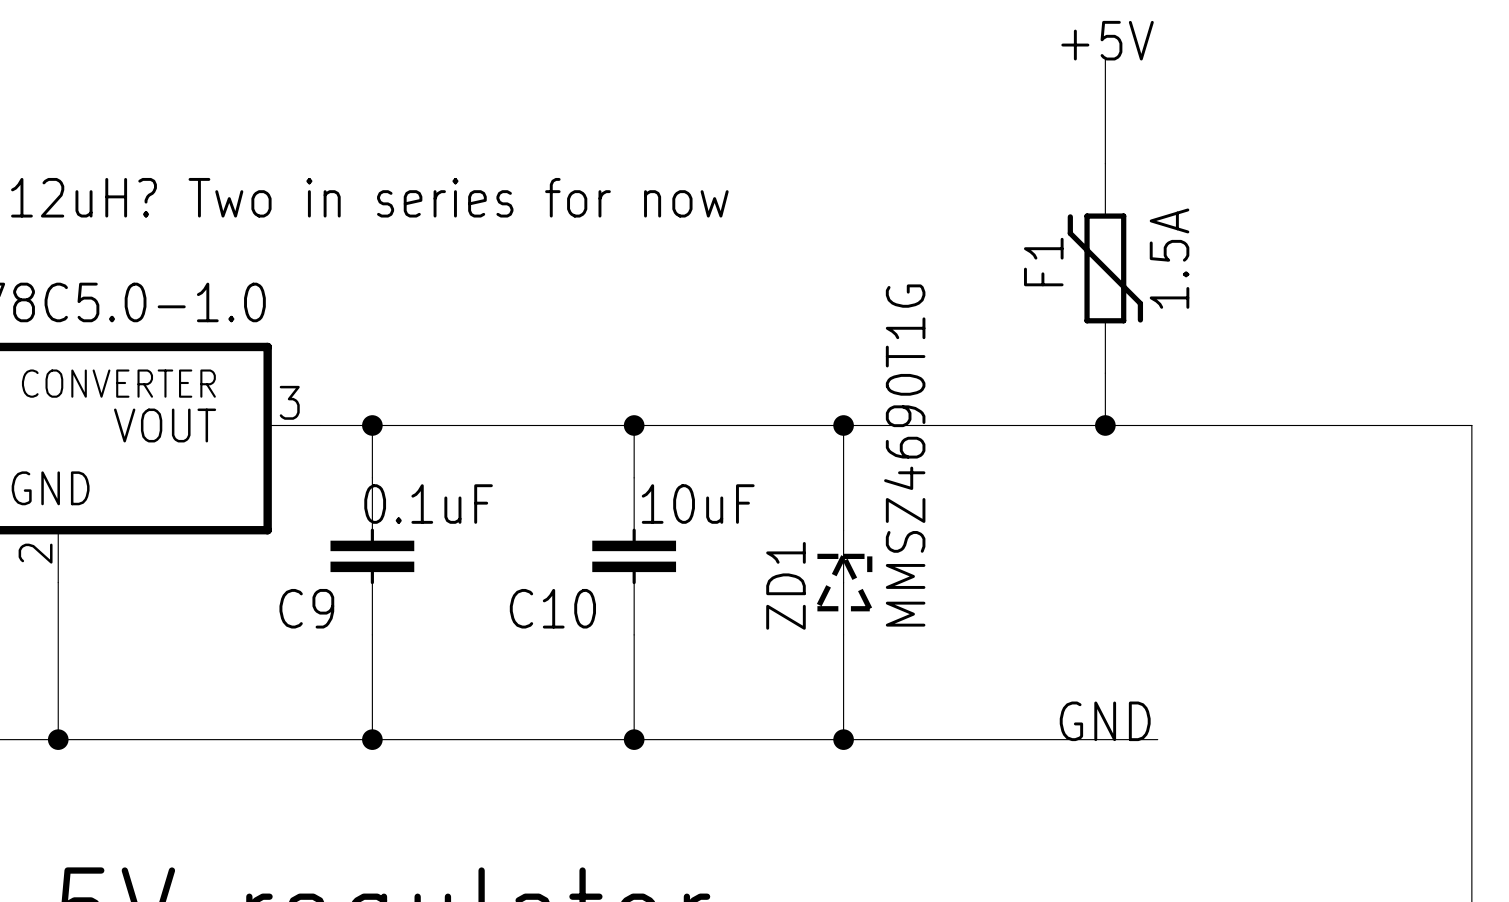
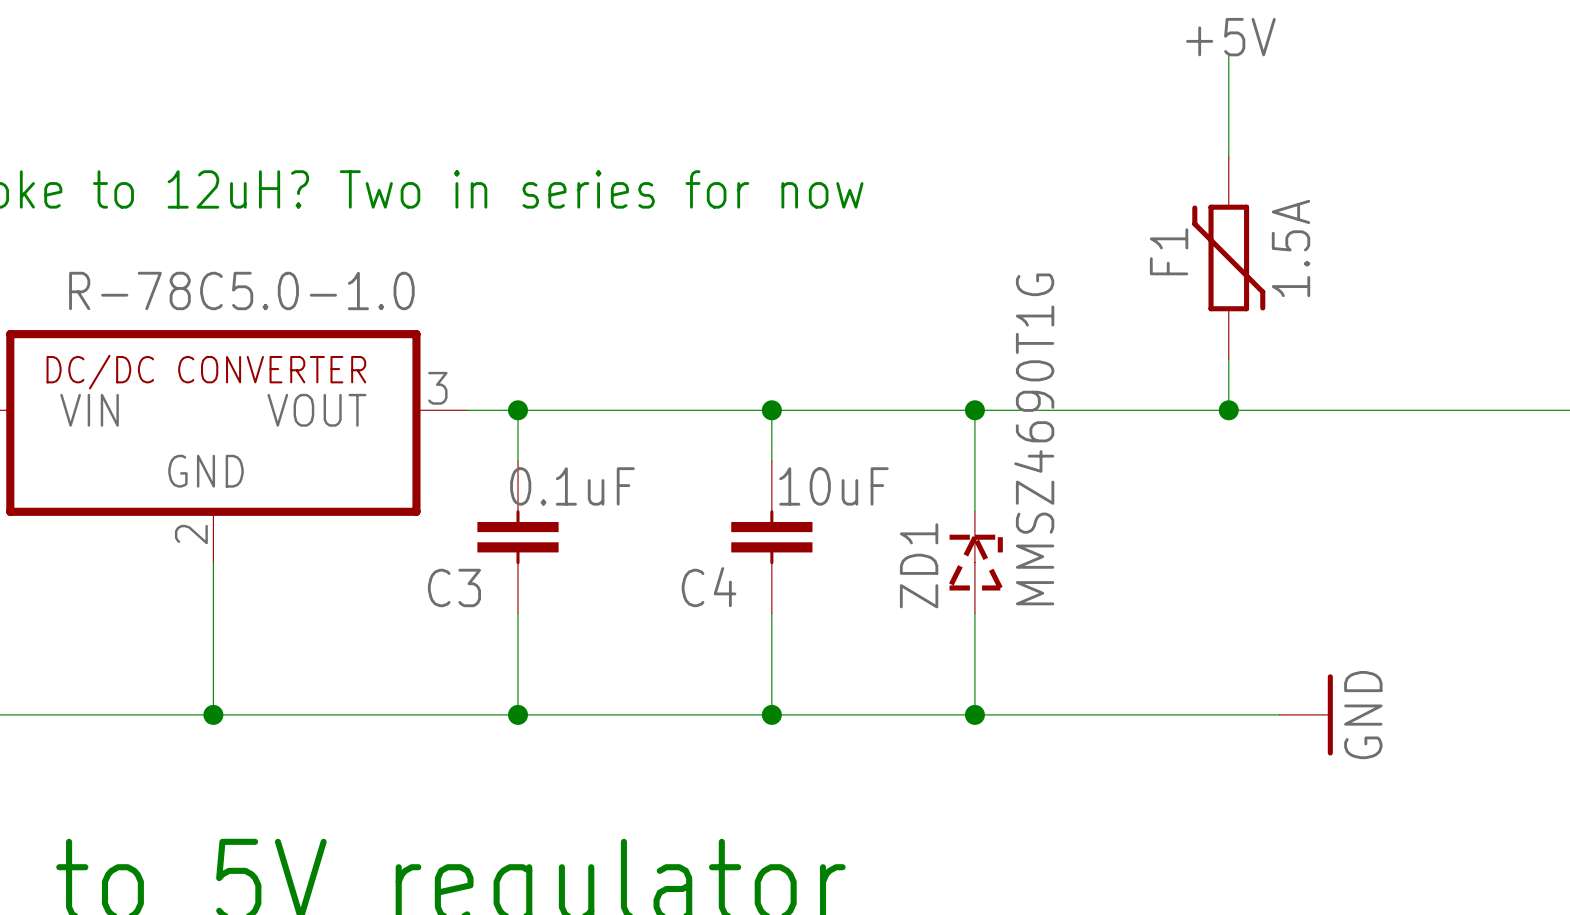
C9 name: C9 (306, 608) -> C3 (454, 587)
C10 name: C10 (552, 608) -> C4 (709, 587)
label: GND (1105, 721) -> none
power symbol: none -> GND (1306, 714)

